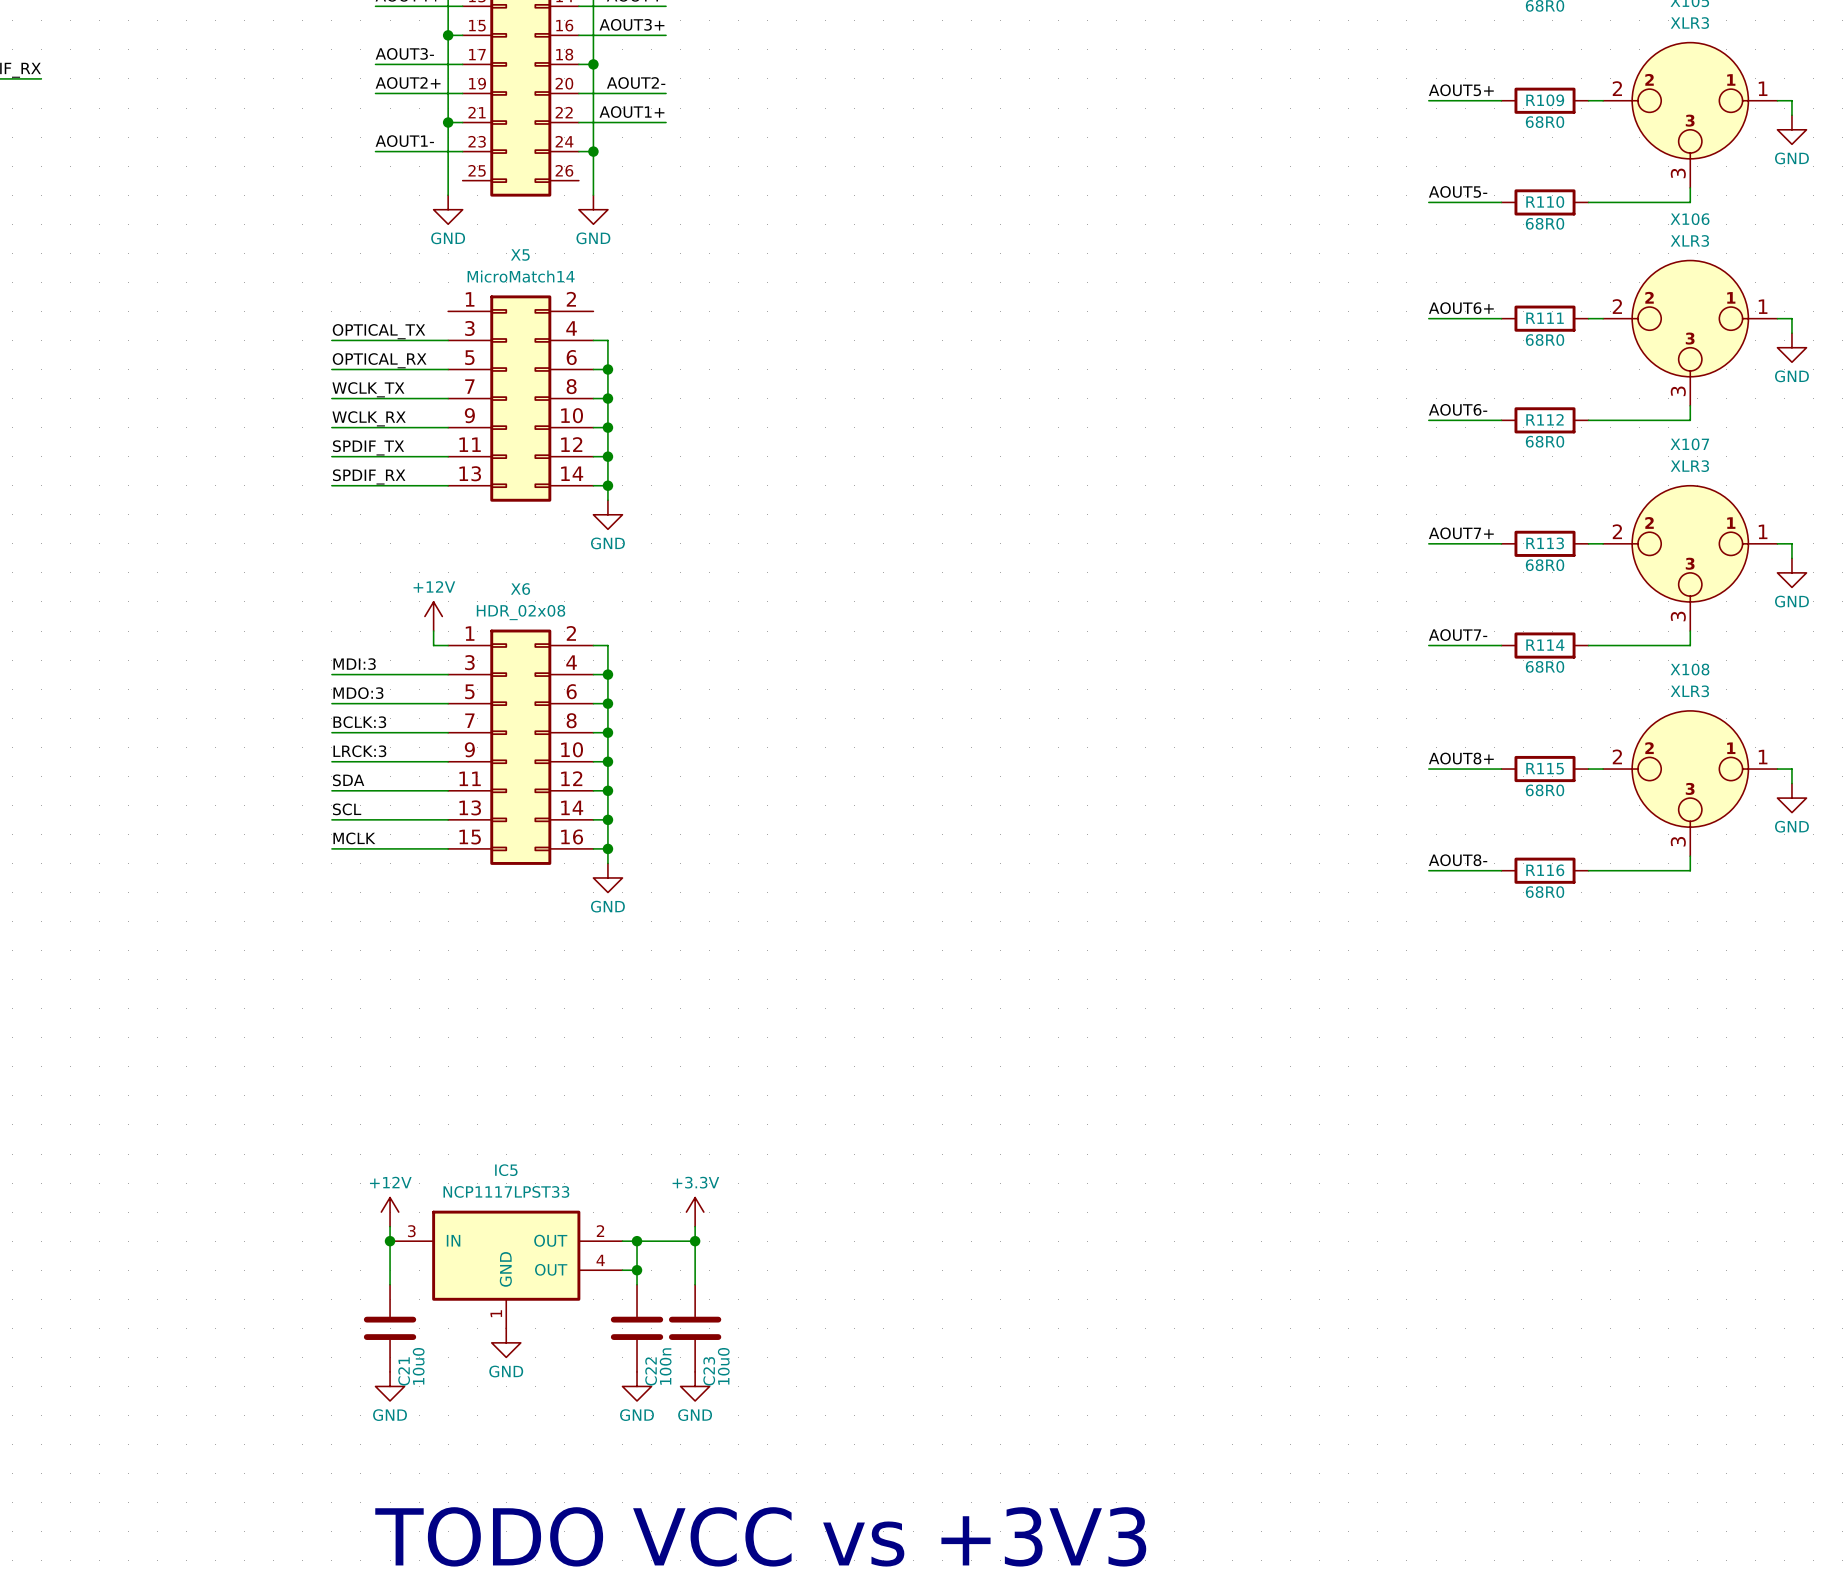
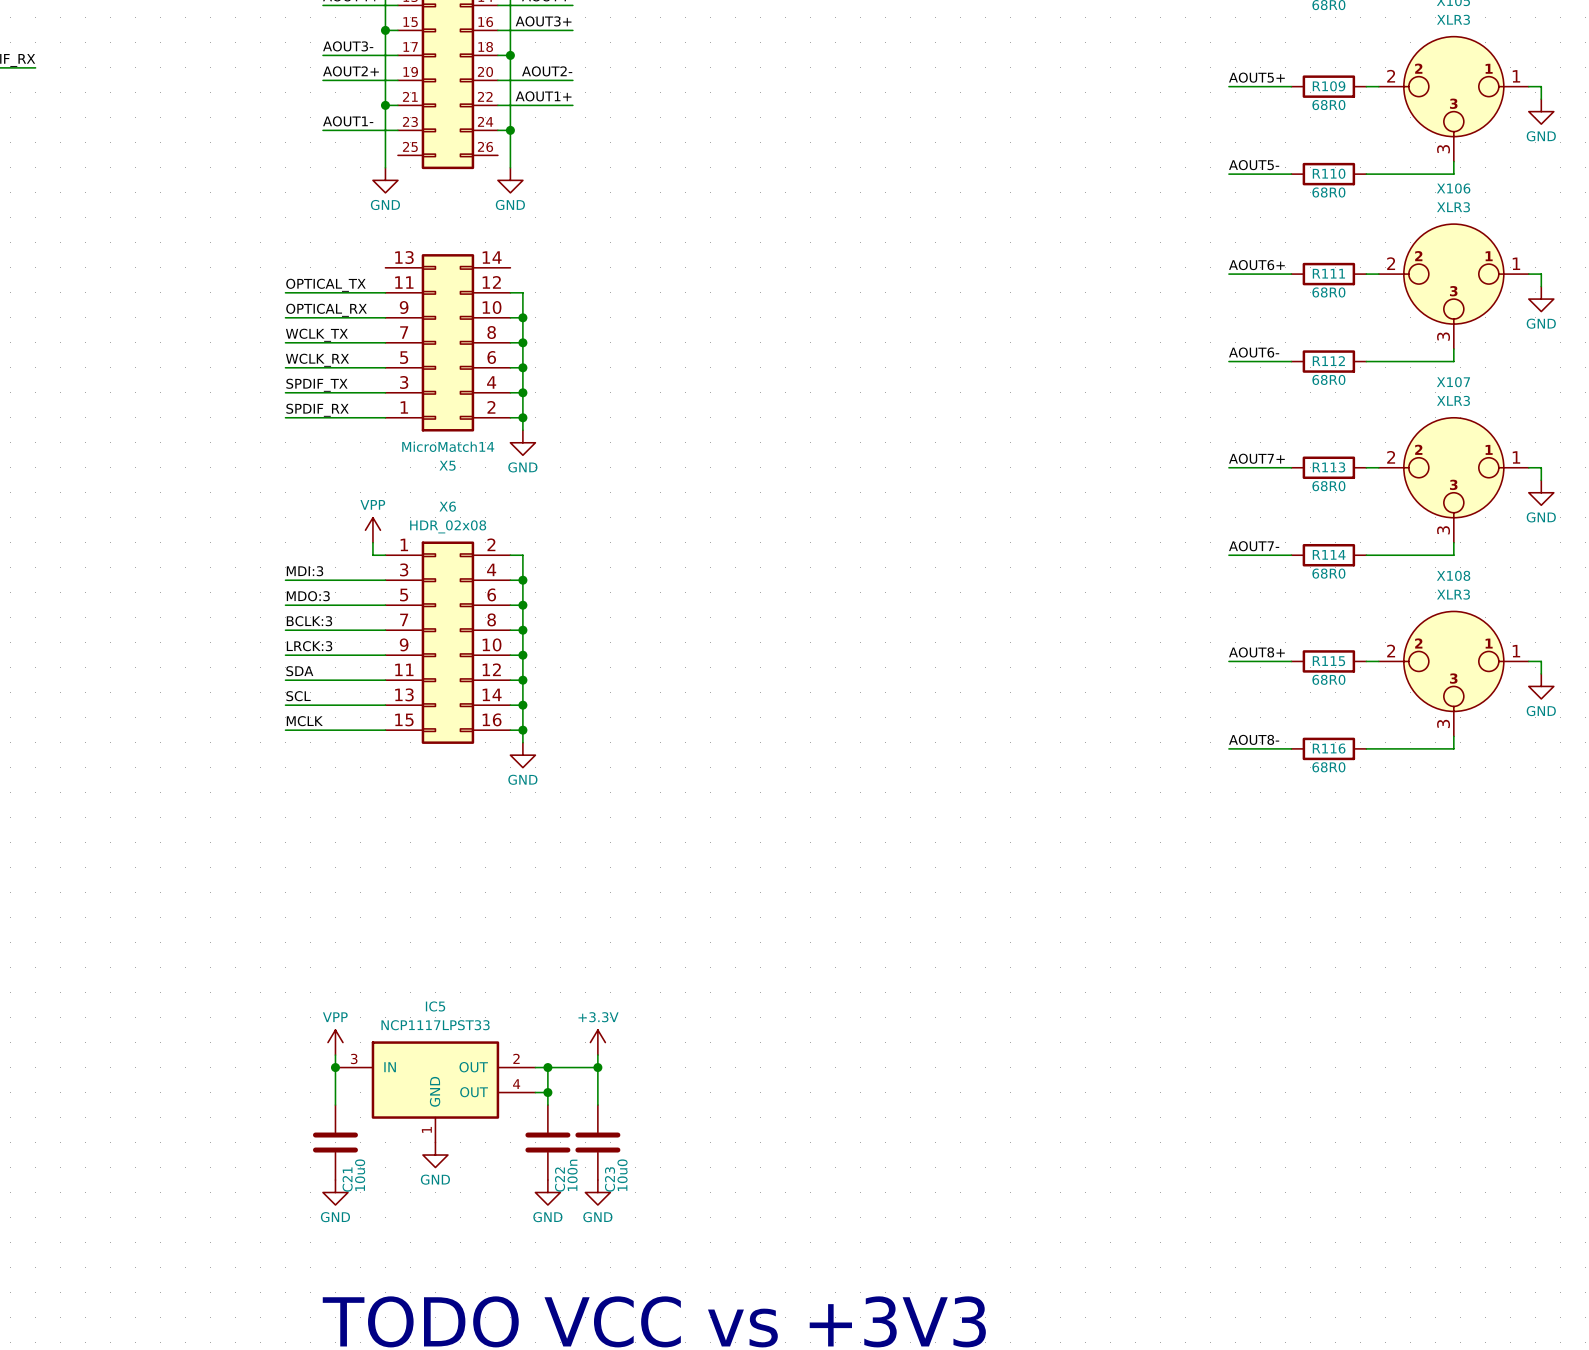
X5 flip: as is (520, 398) -> up-down (447, 342)
power symbol: +12V (433, 616) -> VPP (372, 530)
power symbol: +12V (390, 1212) -> VPP (335, 1042)

